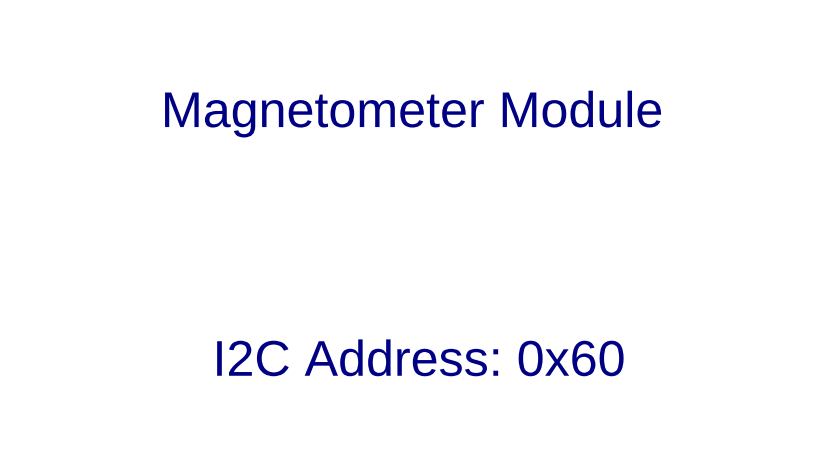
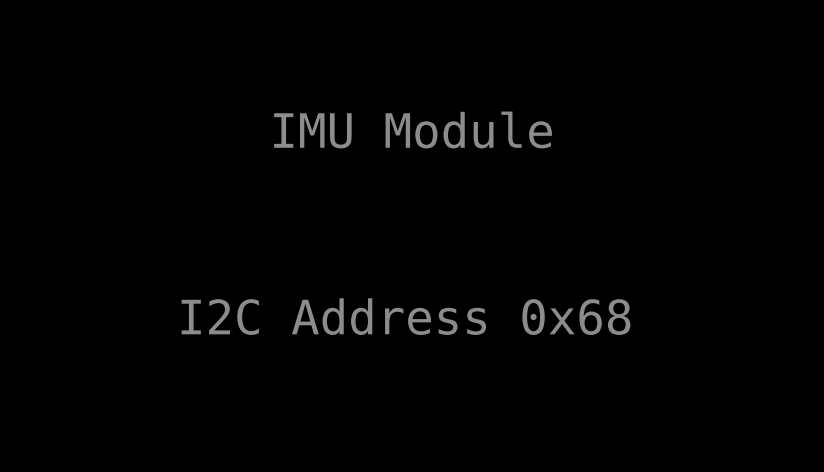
text: Magnetometer Module (413, 114) -> IMU Module (413, 130)
text: I2C Address: 0x60 (420, 357) -> I2C Address 0x68 (406, 316)

